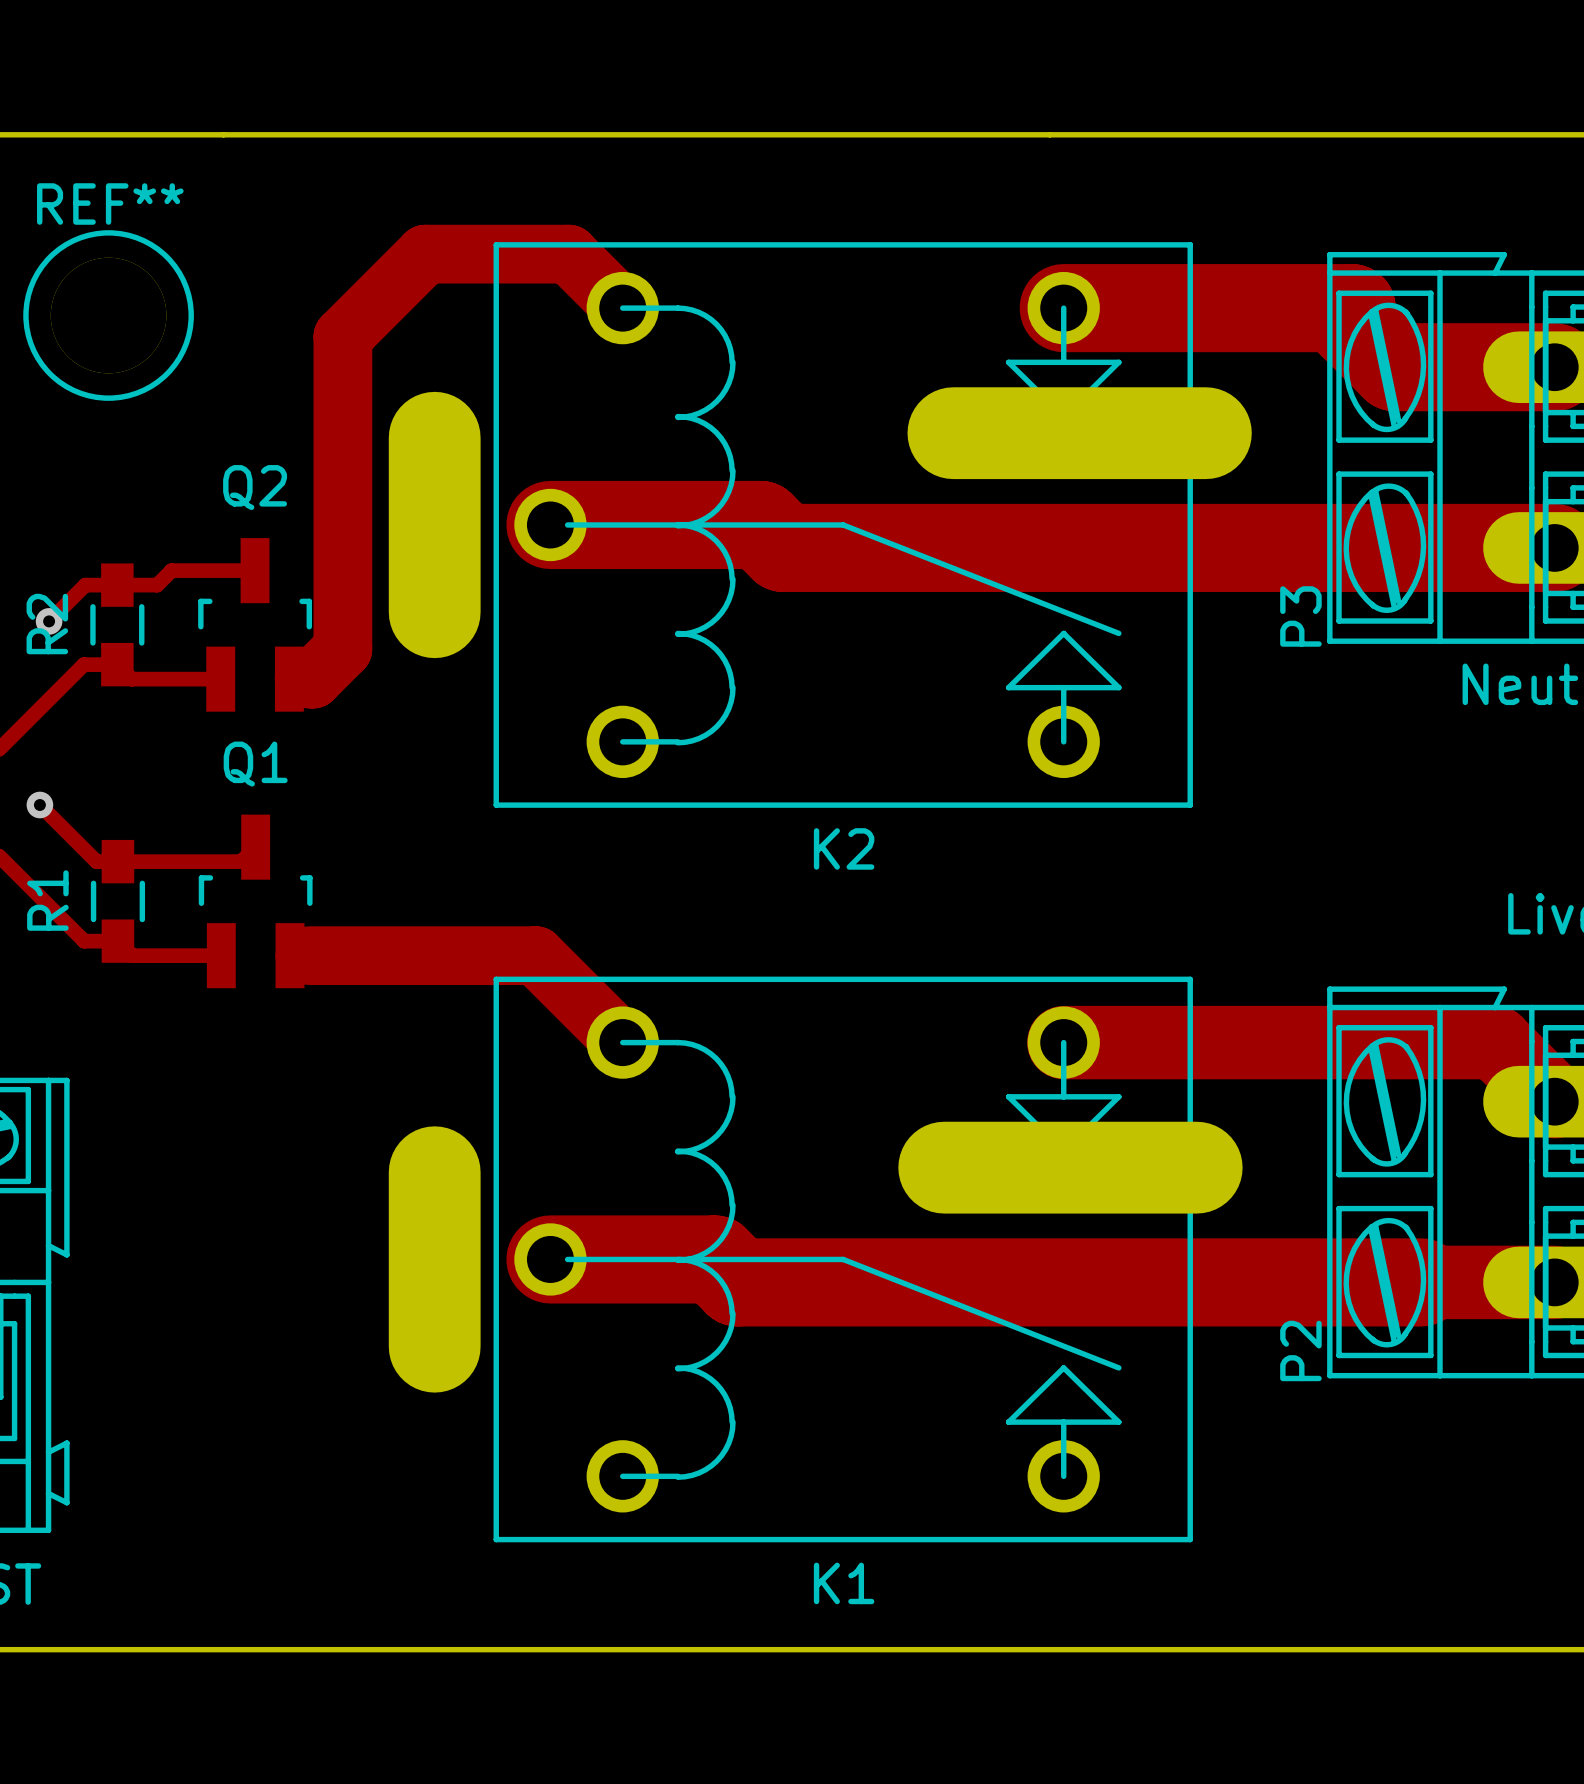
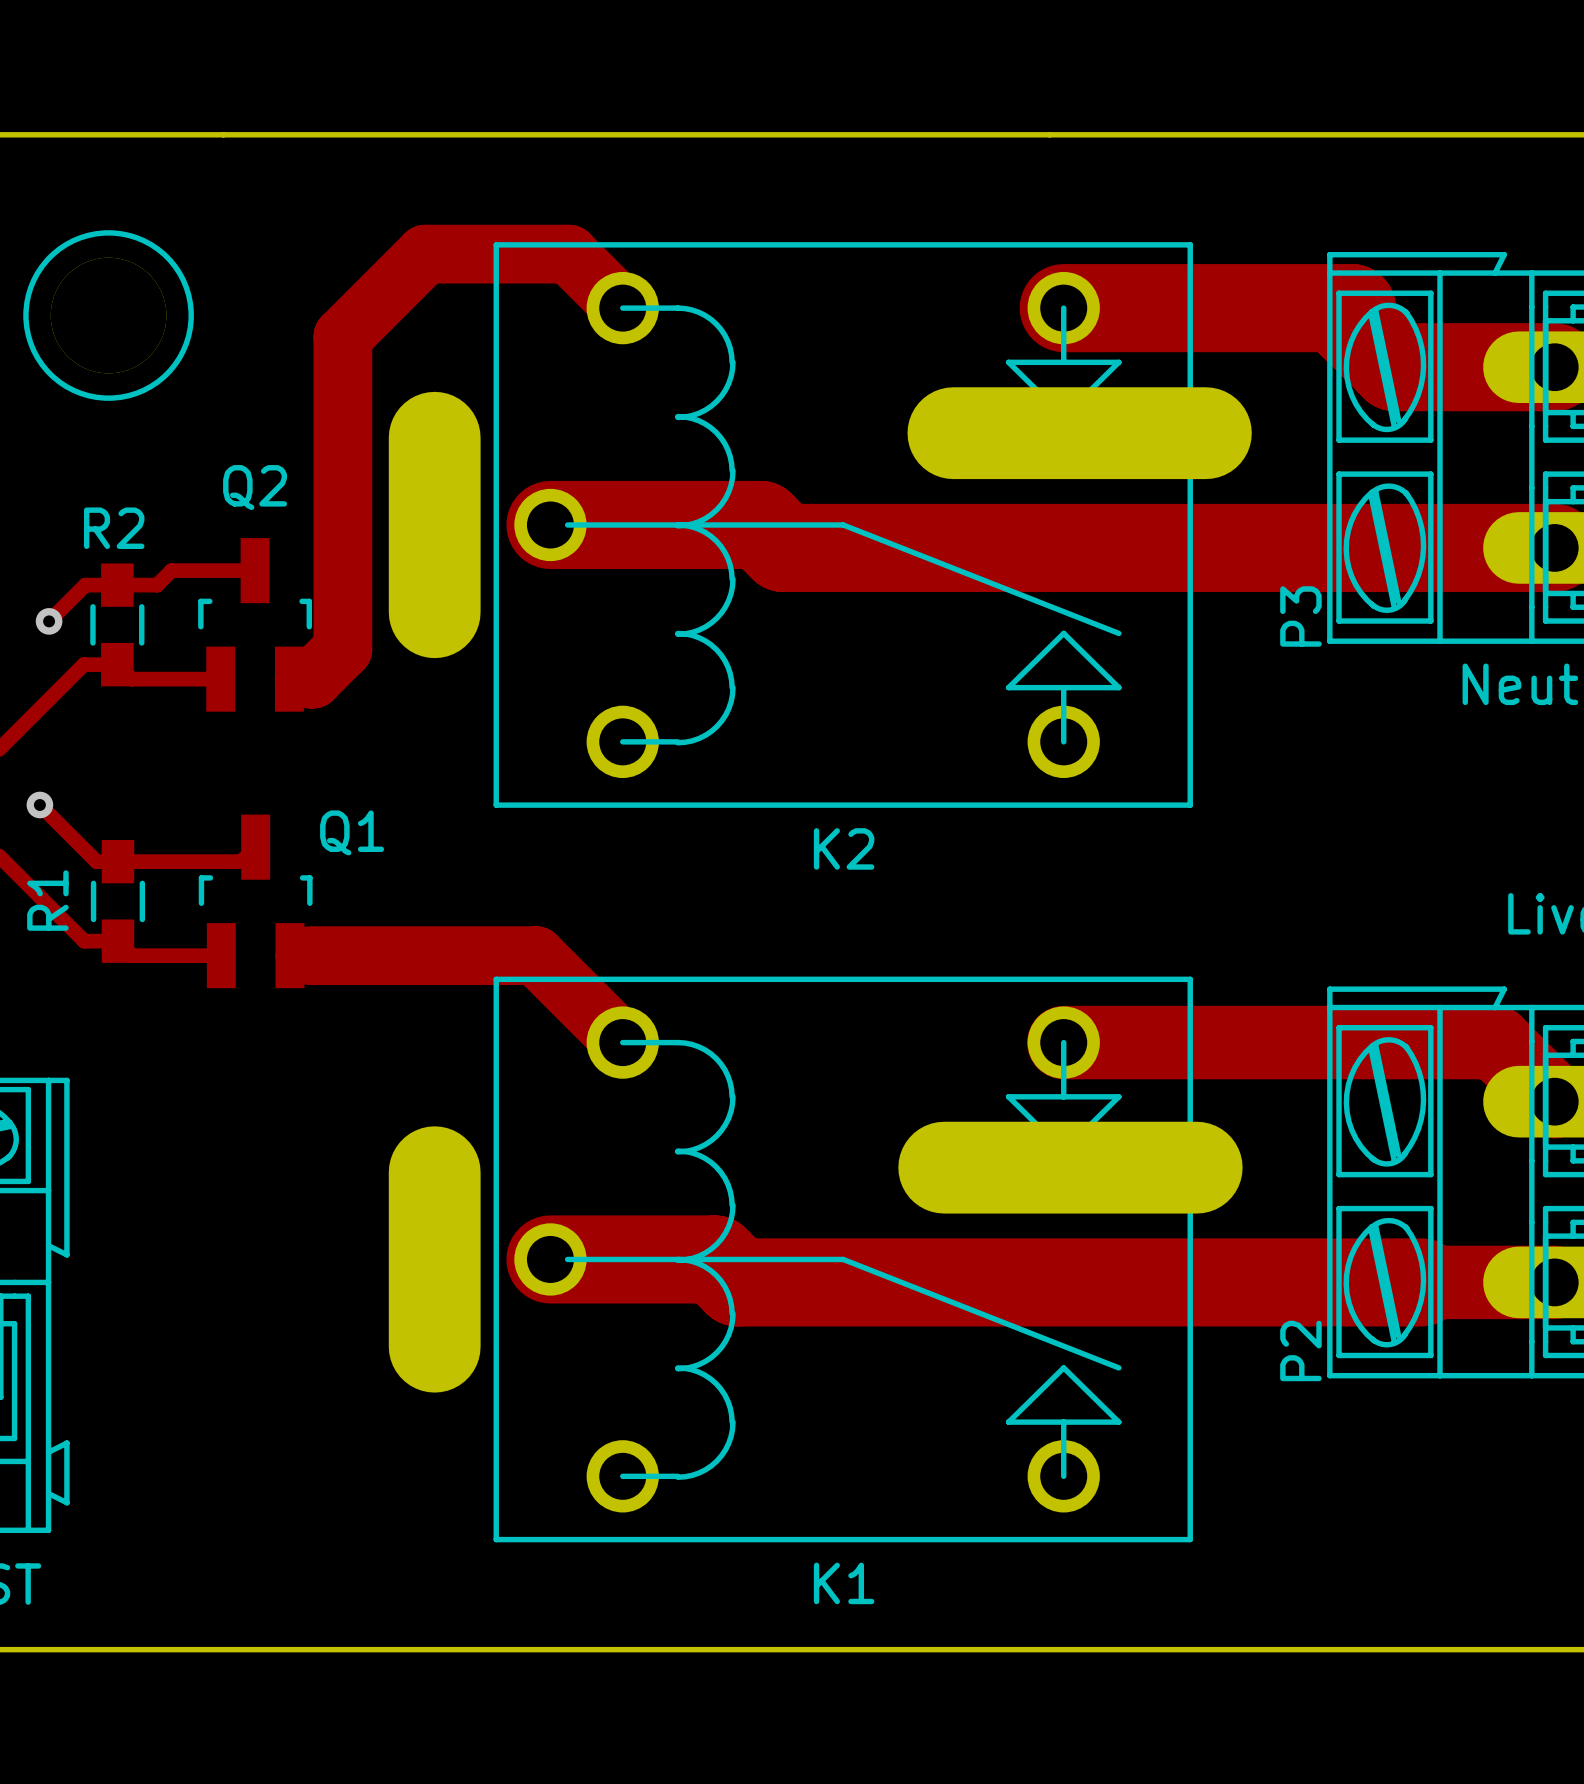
REF** name: REF** (110, 204) -> none
R2 name rotation: 0° (47, 624) -> 90° clockwise (114, 528)
R2 name position: R2 (47, 624) -> R2 (114, 528)
Q1 name position: Q1 (255, 764) -> Q1 (352, 832)

